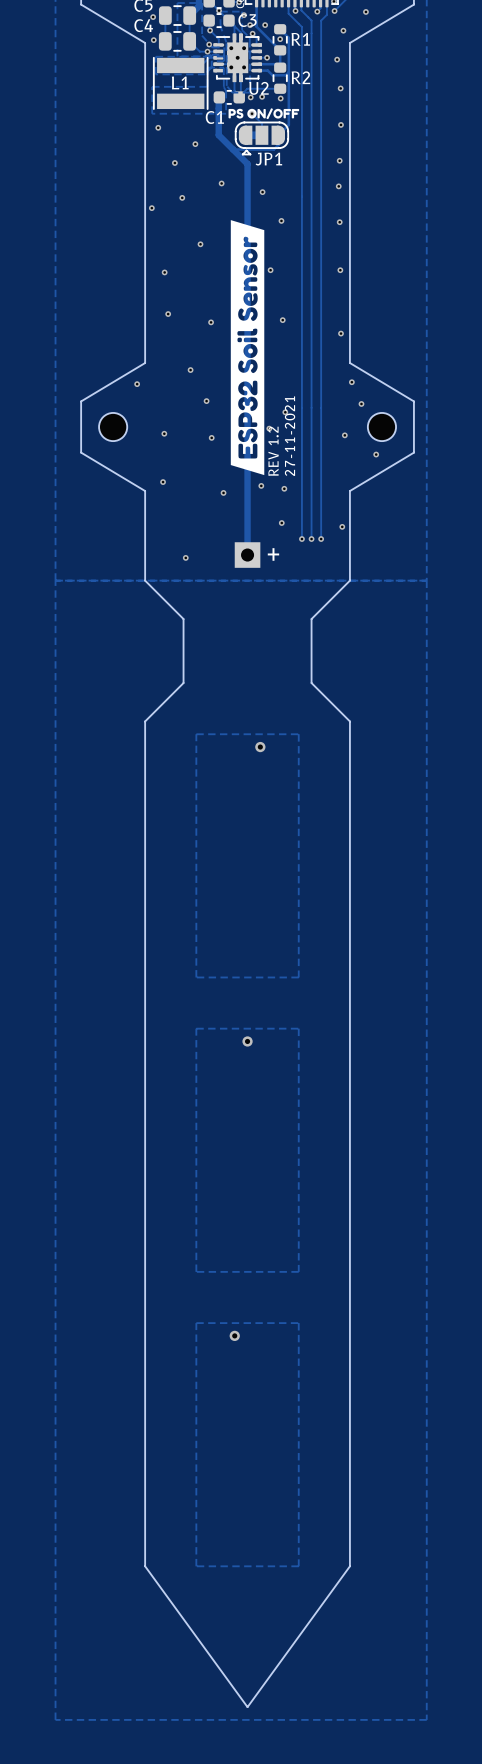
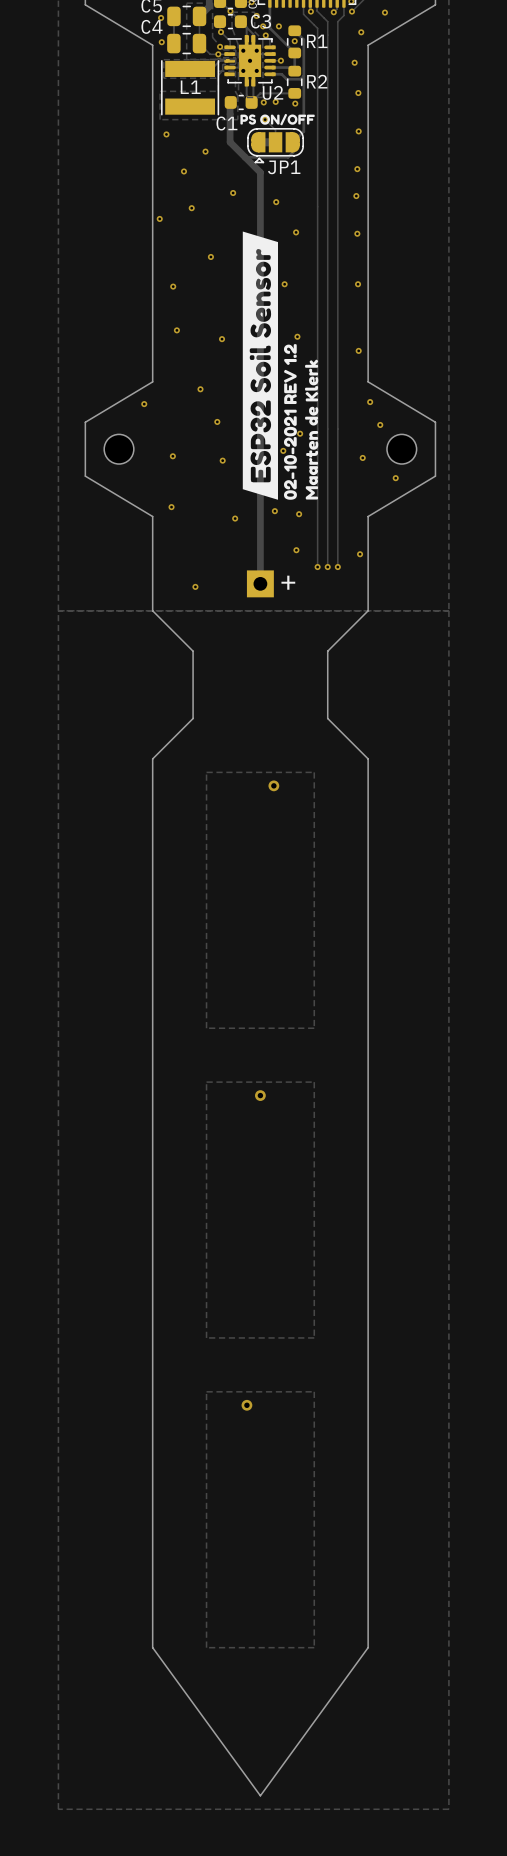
drawing: none -> [283, 344, 319, 500]
text: 27-11-2021 (290, 436) -> none
text: REV 1.2 (273, 451) -> none

